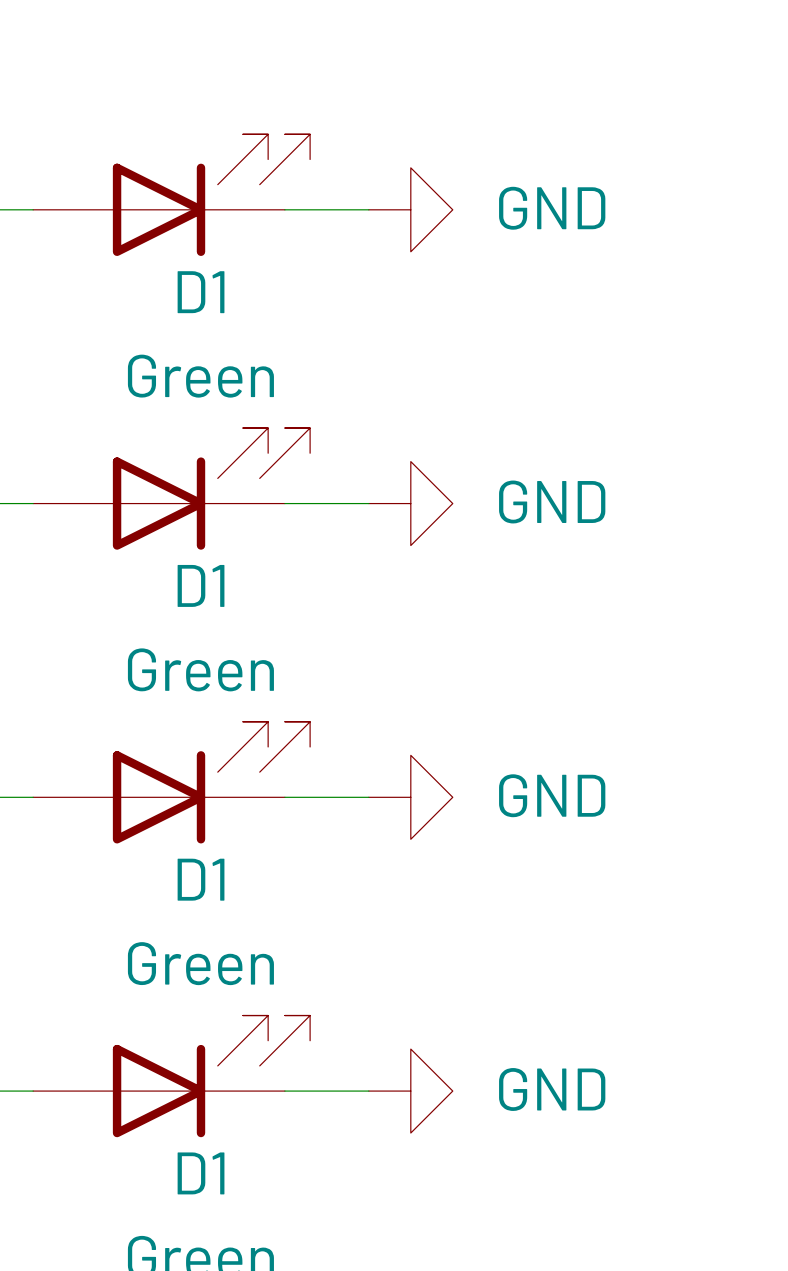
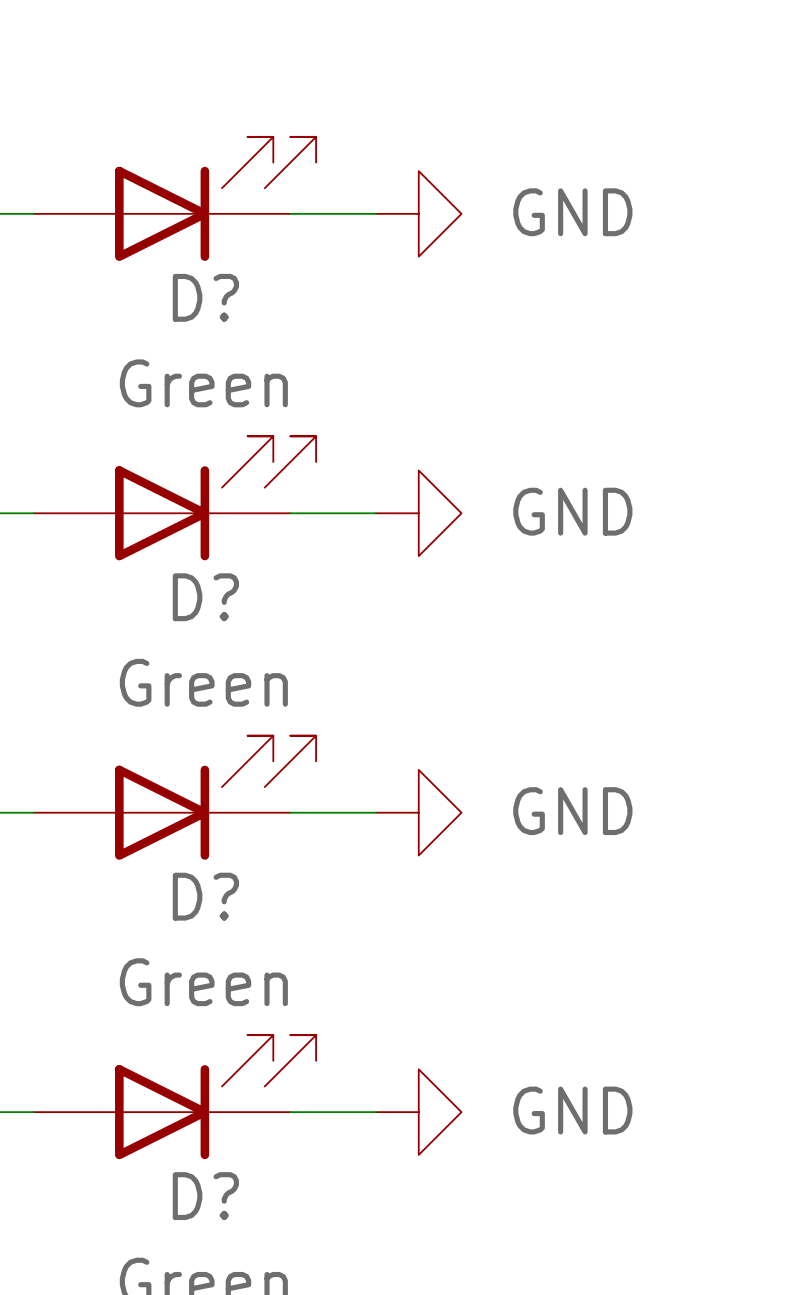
D1 name: D1 (201, 292) -> D? (205, 297)
D1 name: D1 (201, 585) -> D? (205, 597)
D1 name: D1 (201, 879) -> D? (205, 896)
D1 name: D1 (201, 1173) -> D? (205, 1196)

